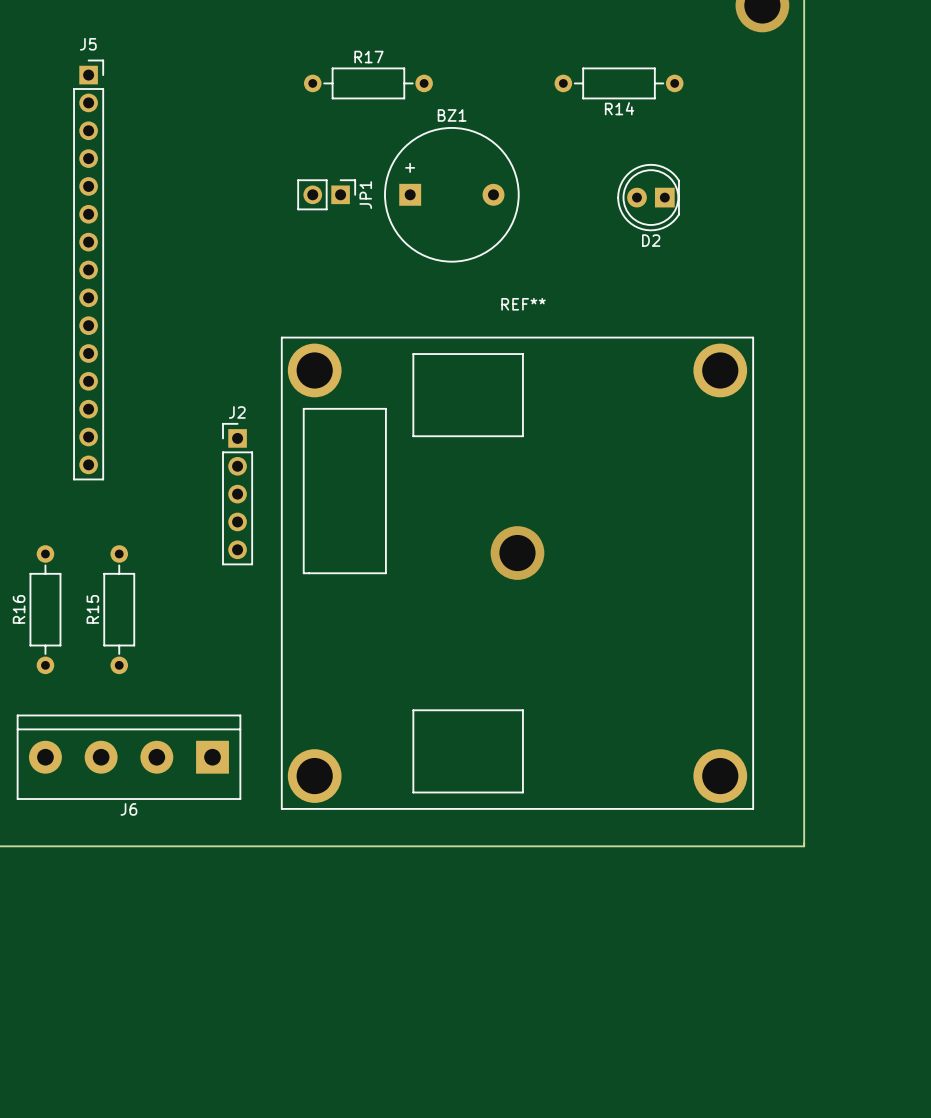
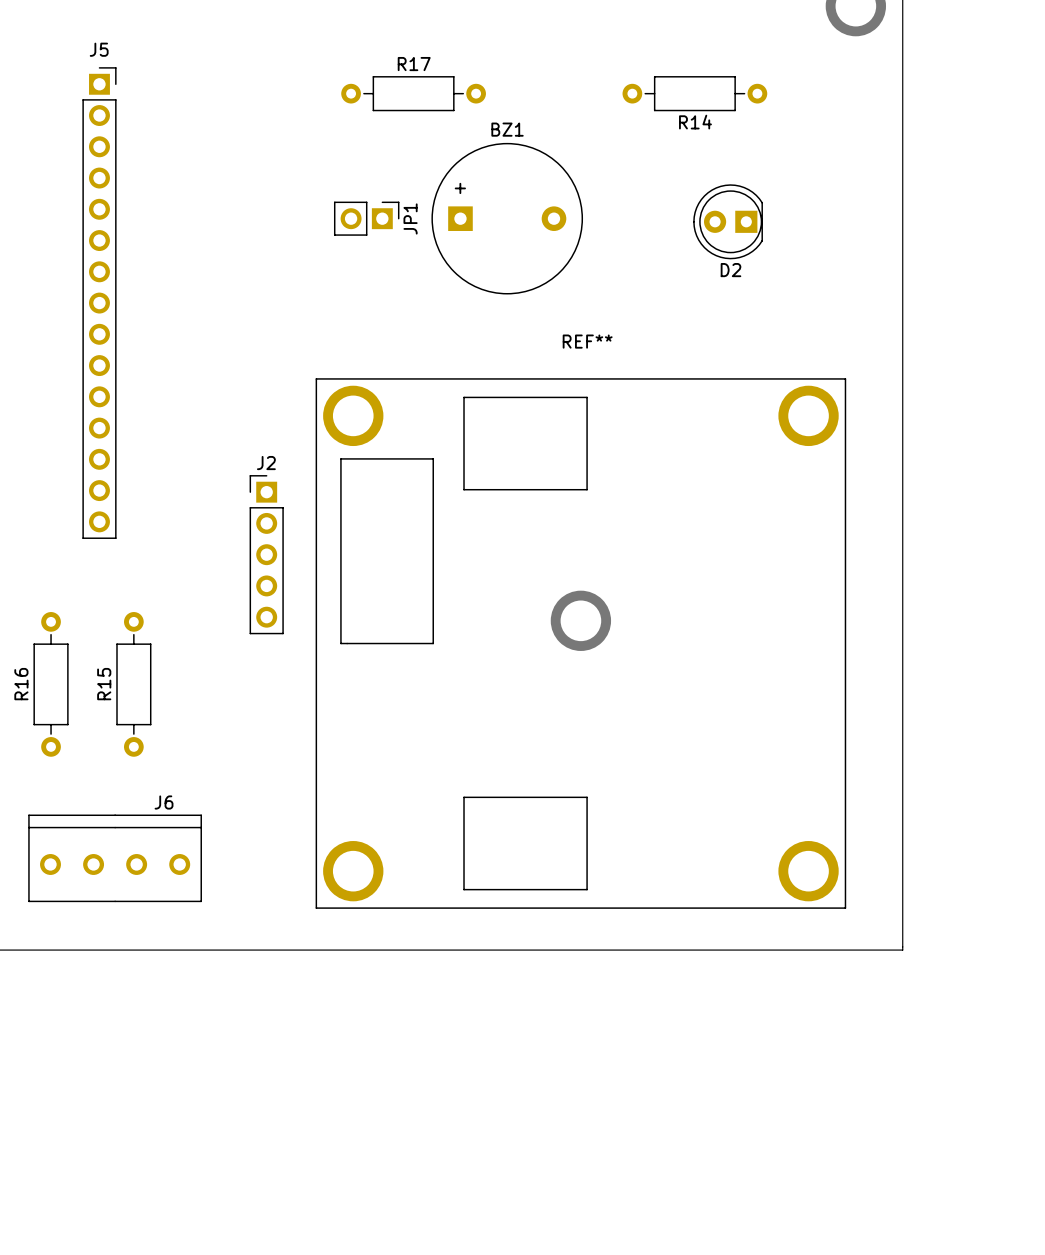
J6 footprint: [16, 714, 242, 800] -> [28, 814, 202, 903]
J6 name position: J6 (128, 809) -> J6 (164, 802)

